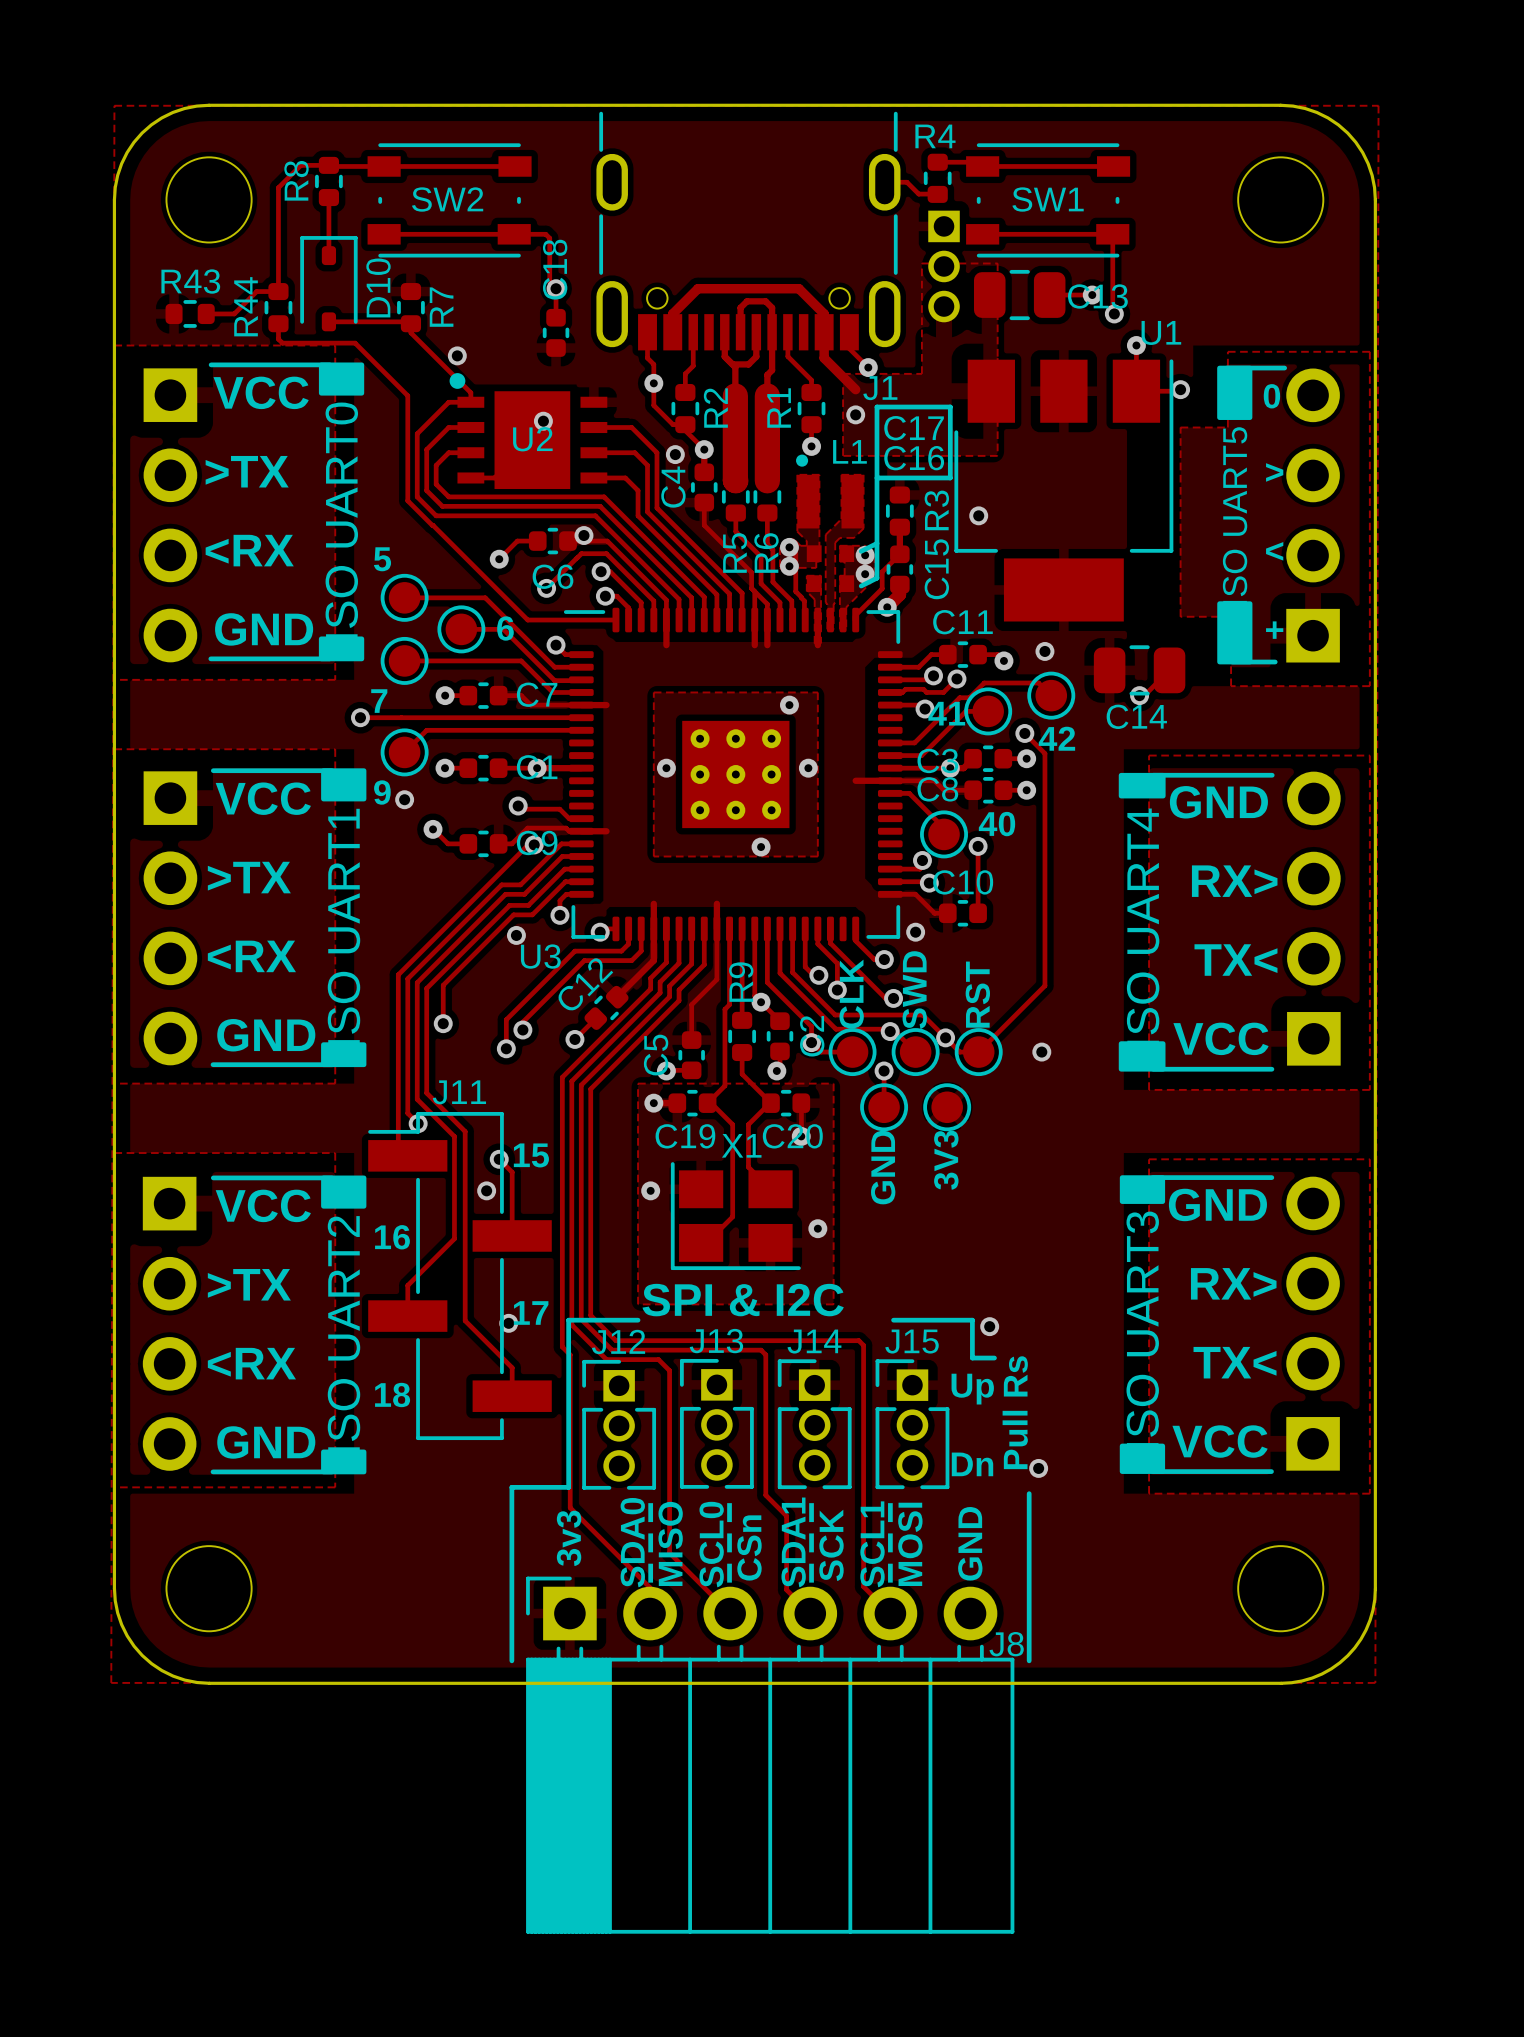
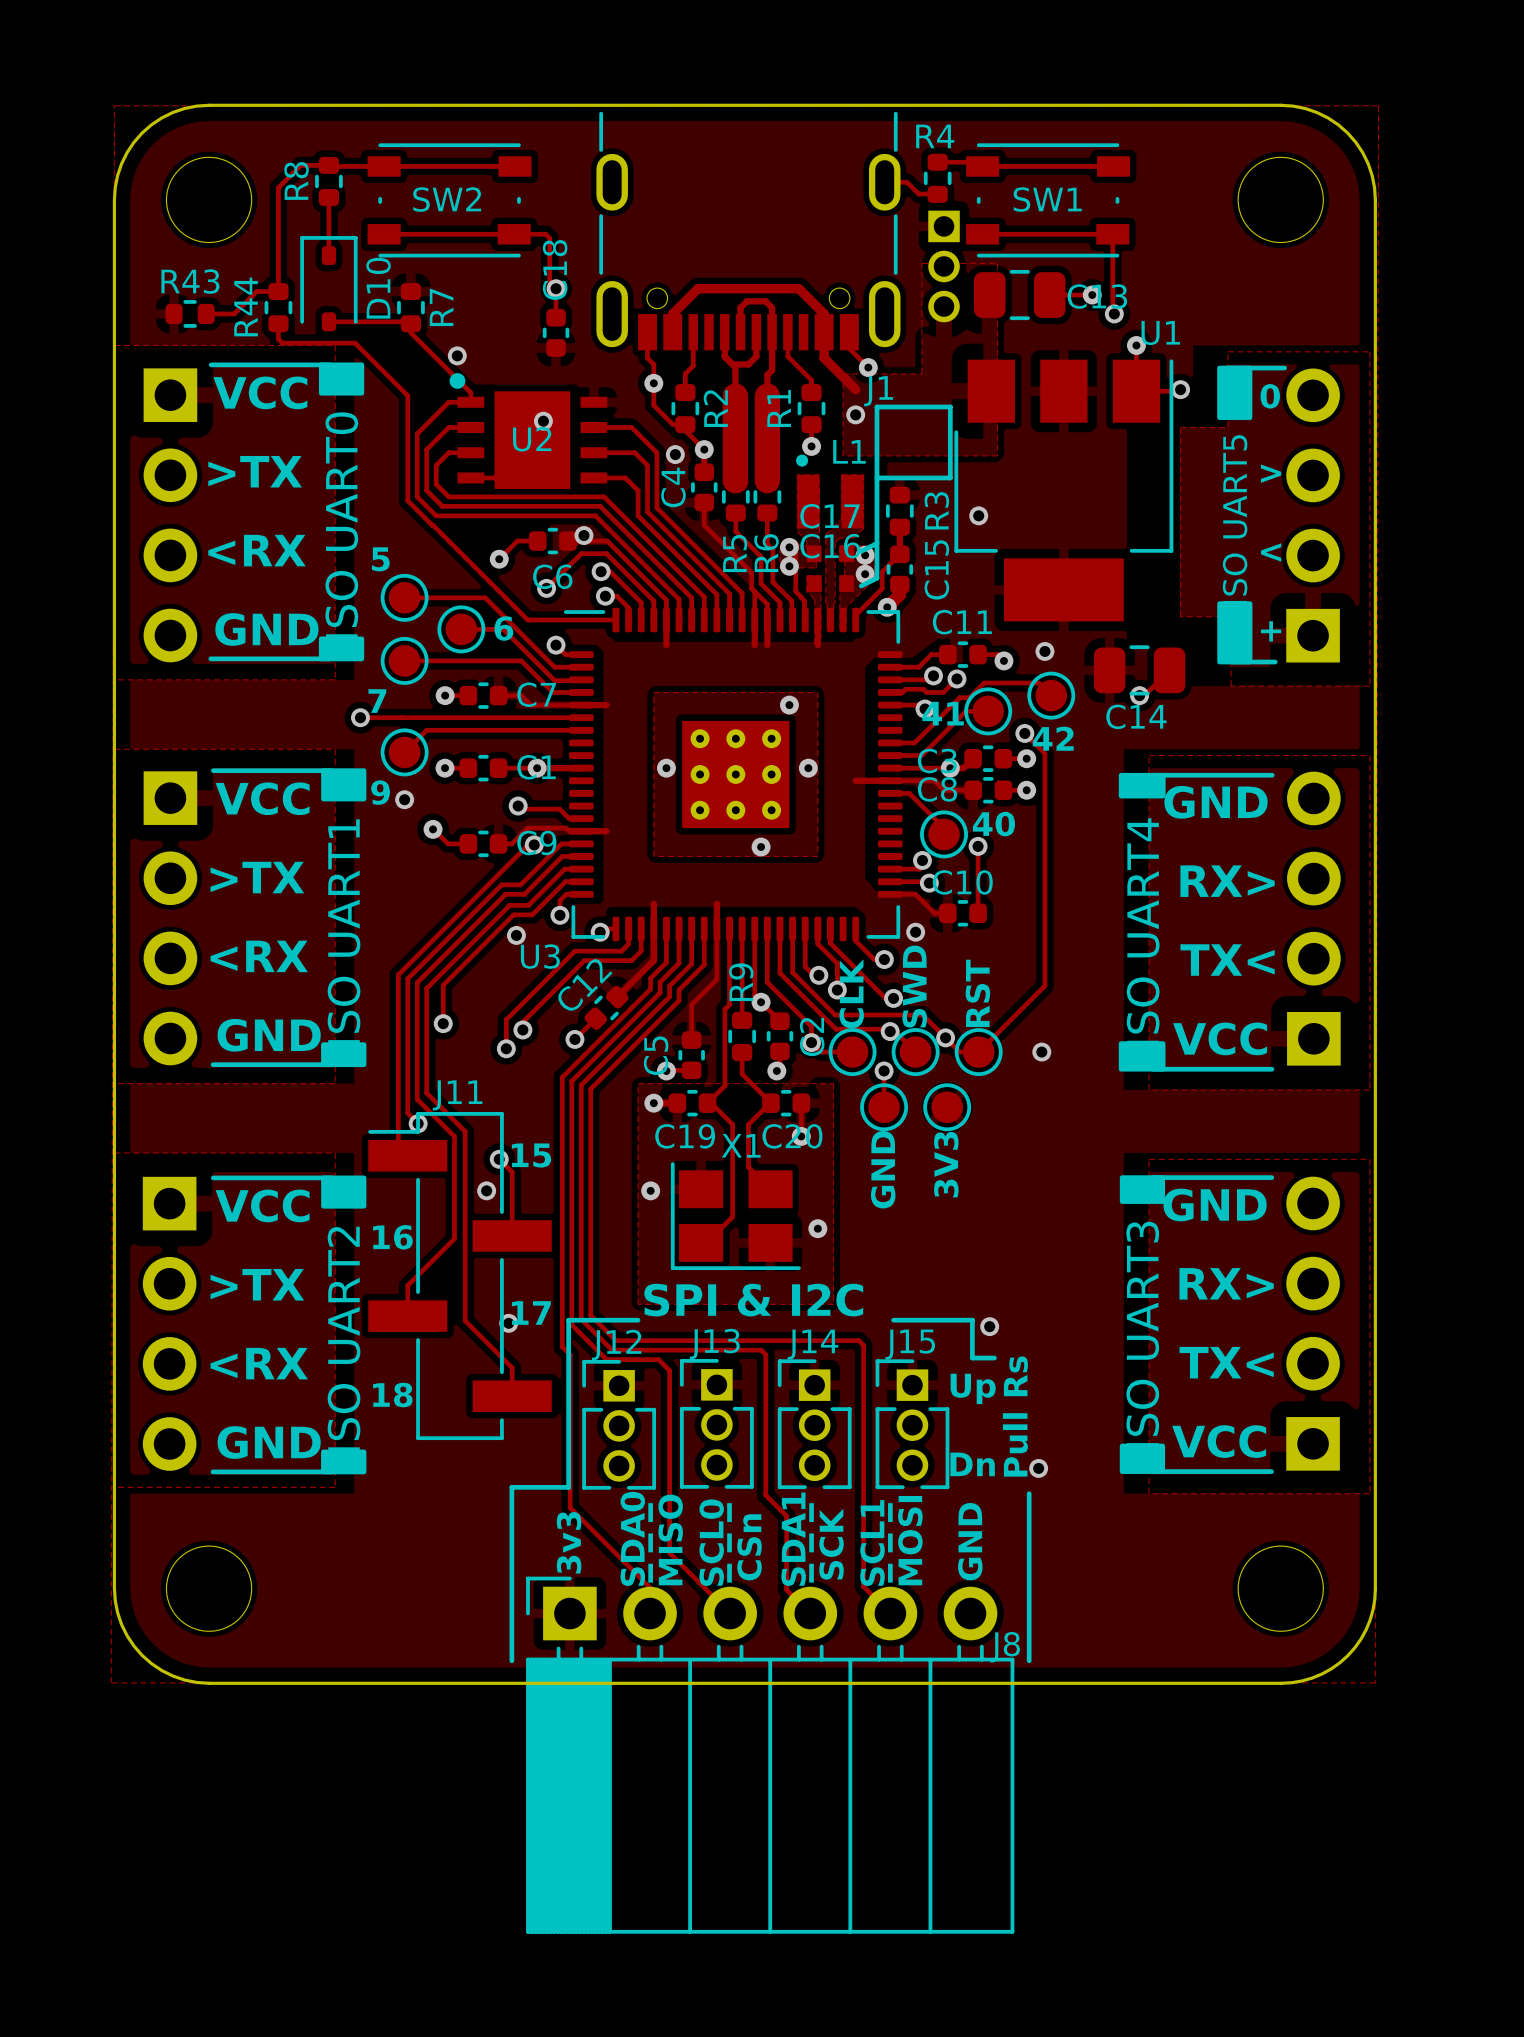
C17 name position: C17 (914, 428) -> C17 (829, 516)
C16 name position: C16 (914, 458) -> C16 (830, 546)

